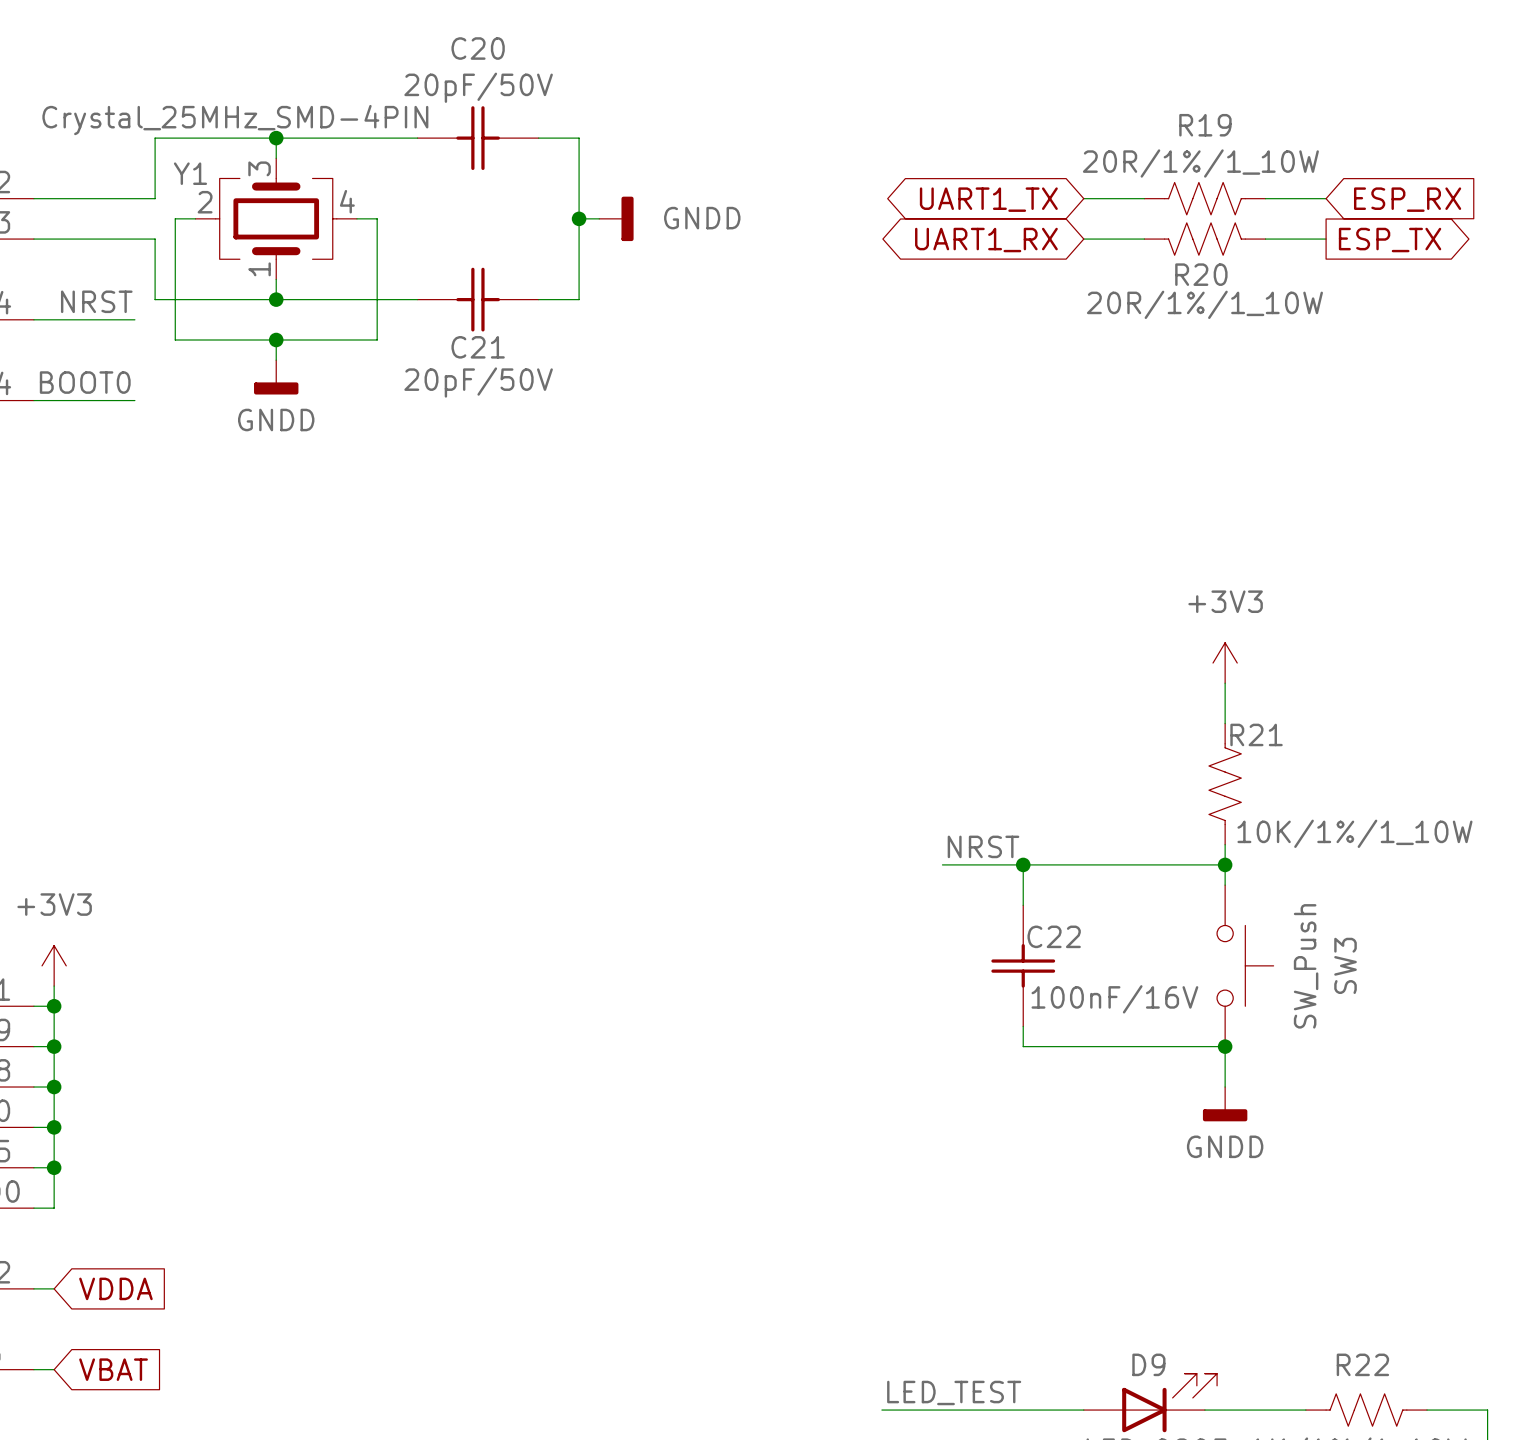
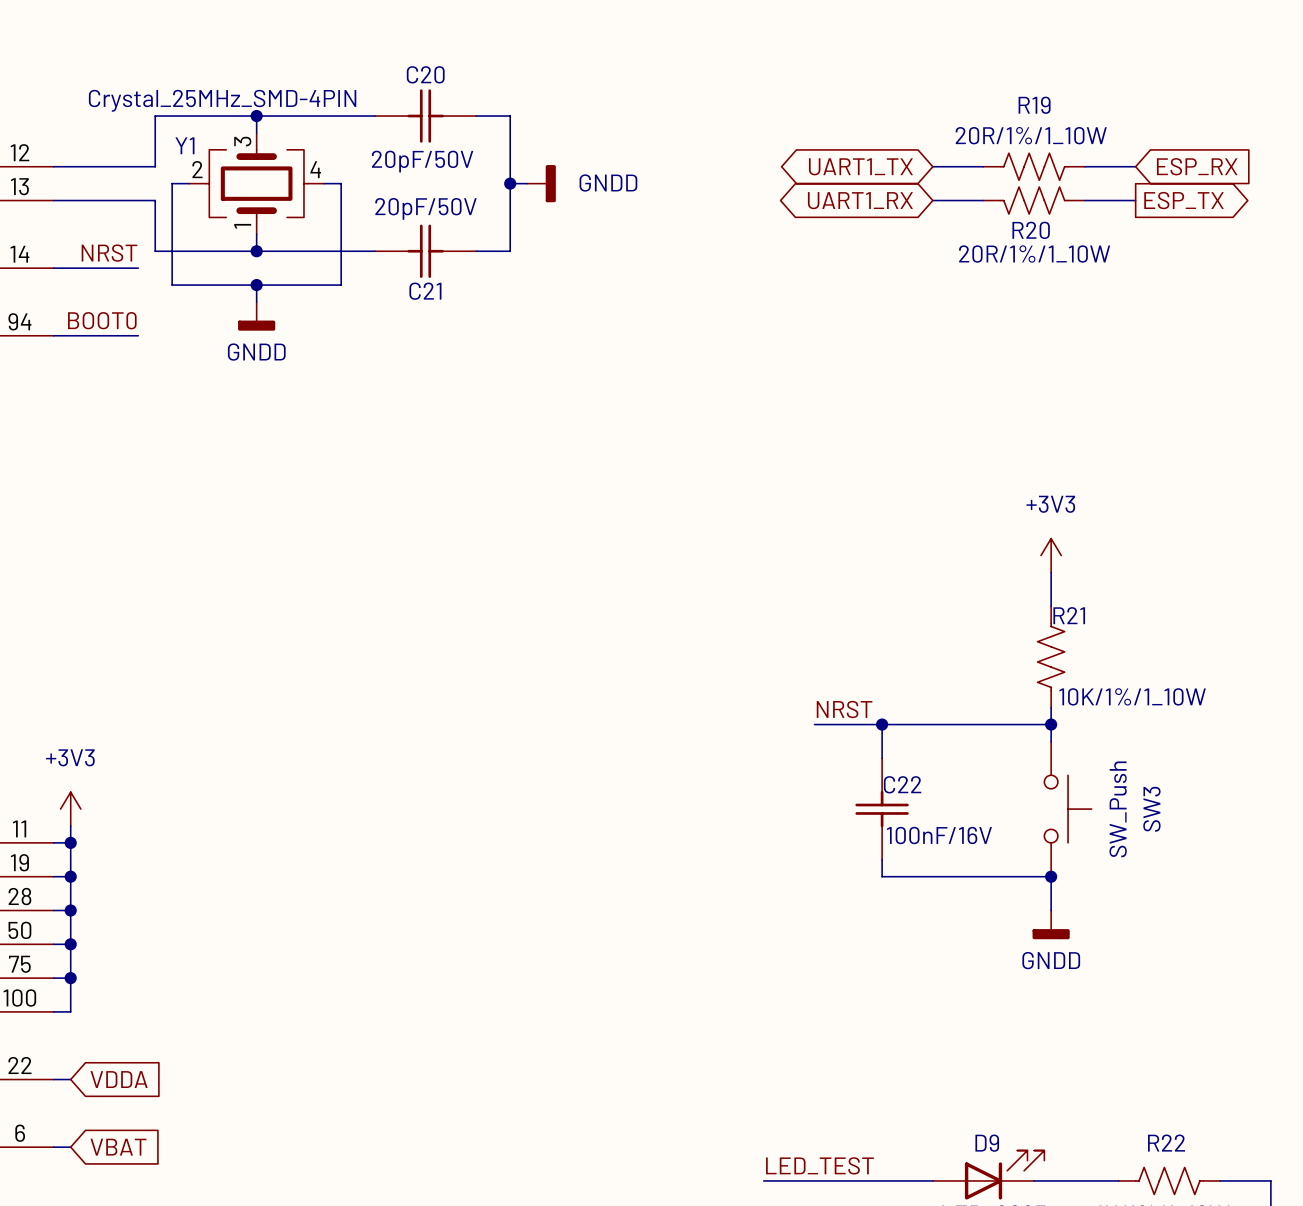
C20 name position: C20 (478, 48) -> C20 (425, 74)
C20 value position: 20pF/50V (478, 87) -> 20pF/50V (422, 161)
C21 value position: 20pF/50V (478, 382) -> 20pF/50V (425, 208)

